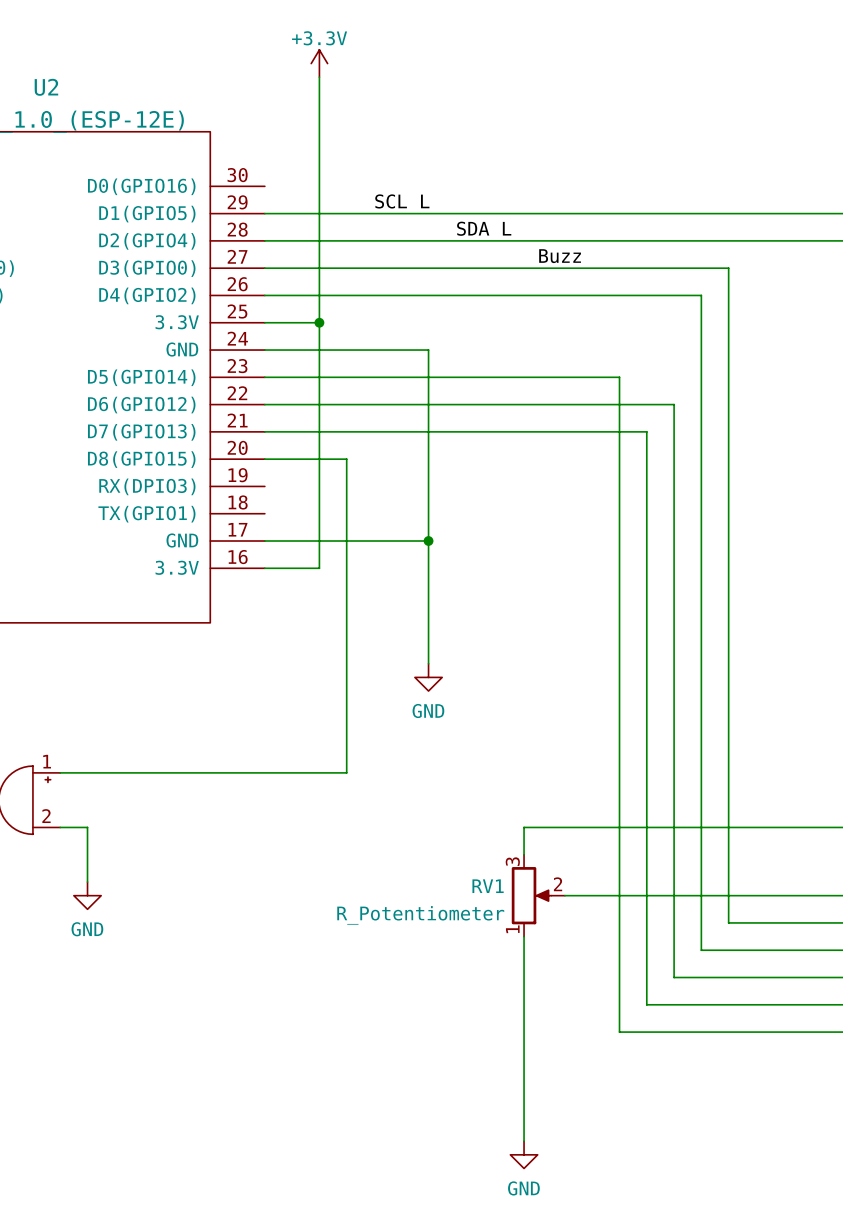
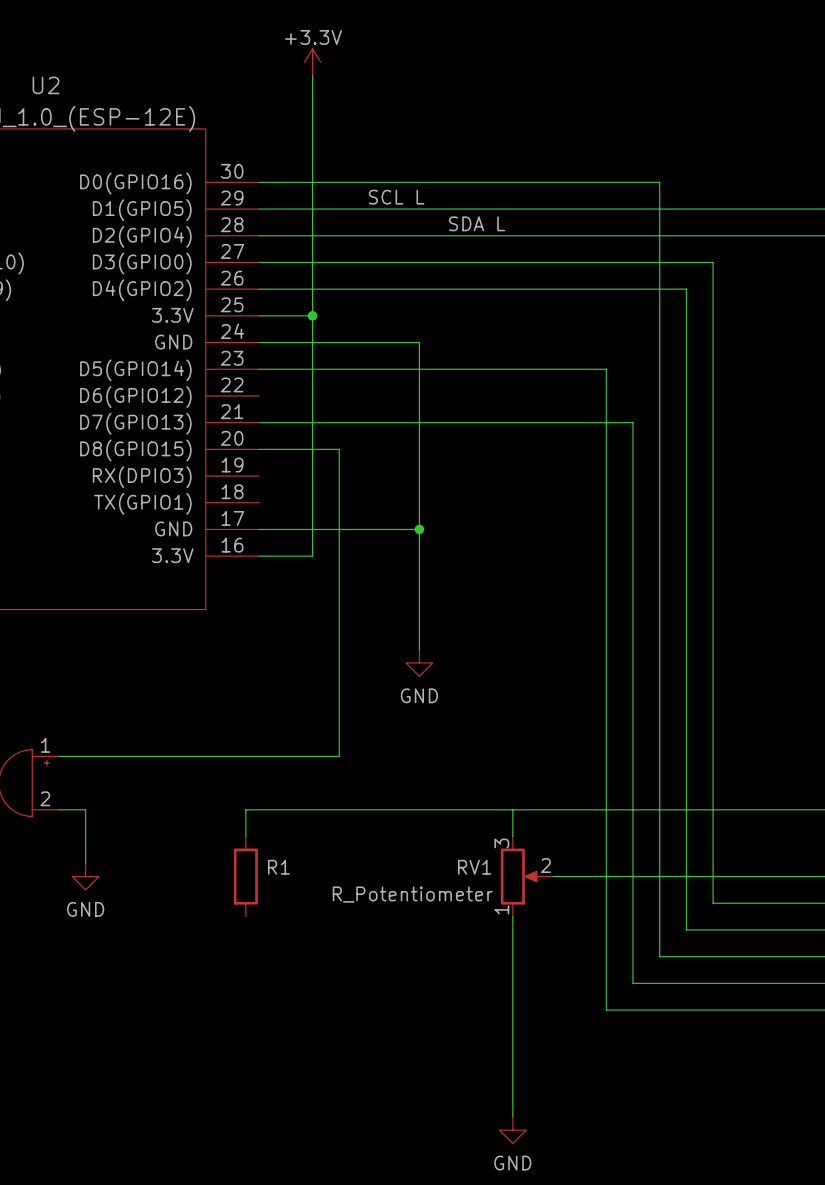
label: Buzz (560, 256) -> none
wire: (264, 404) (674, 404) -> (259, 182) (659, 182) (659, 395)
wire: none -> (512, 809) (245, 809) (245, 836)
R1: none -> (245, 876)

